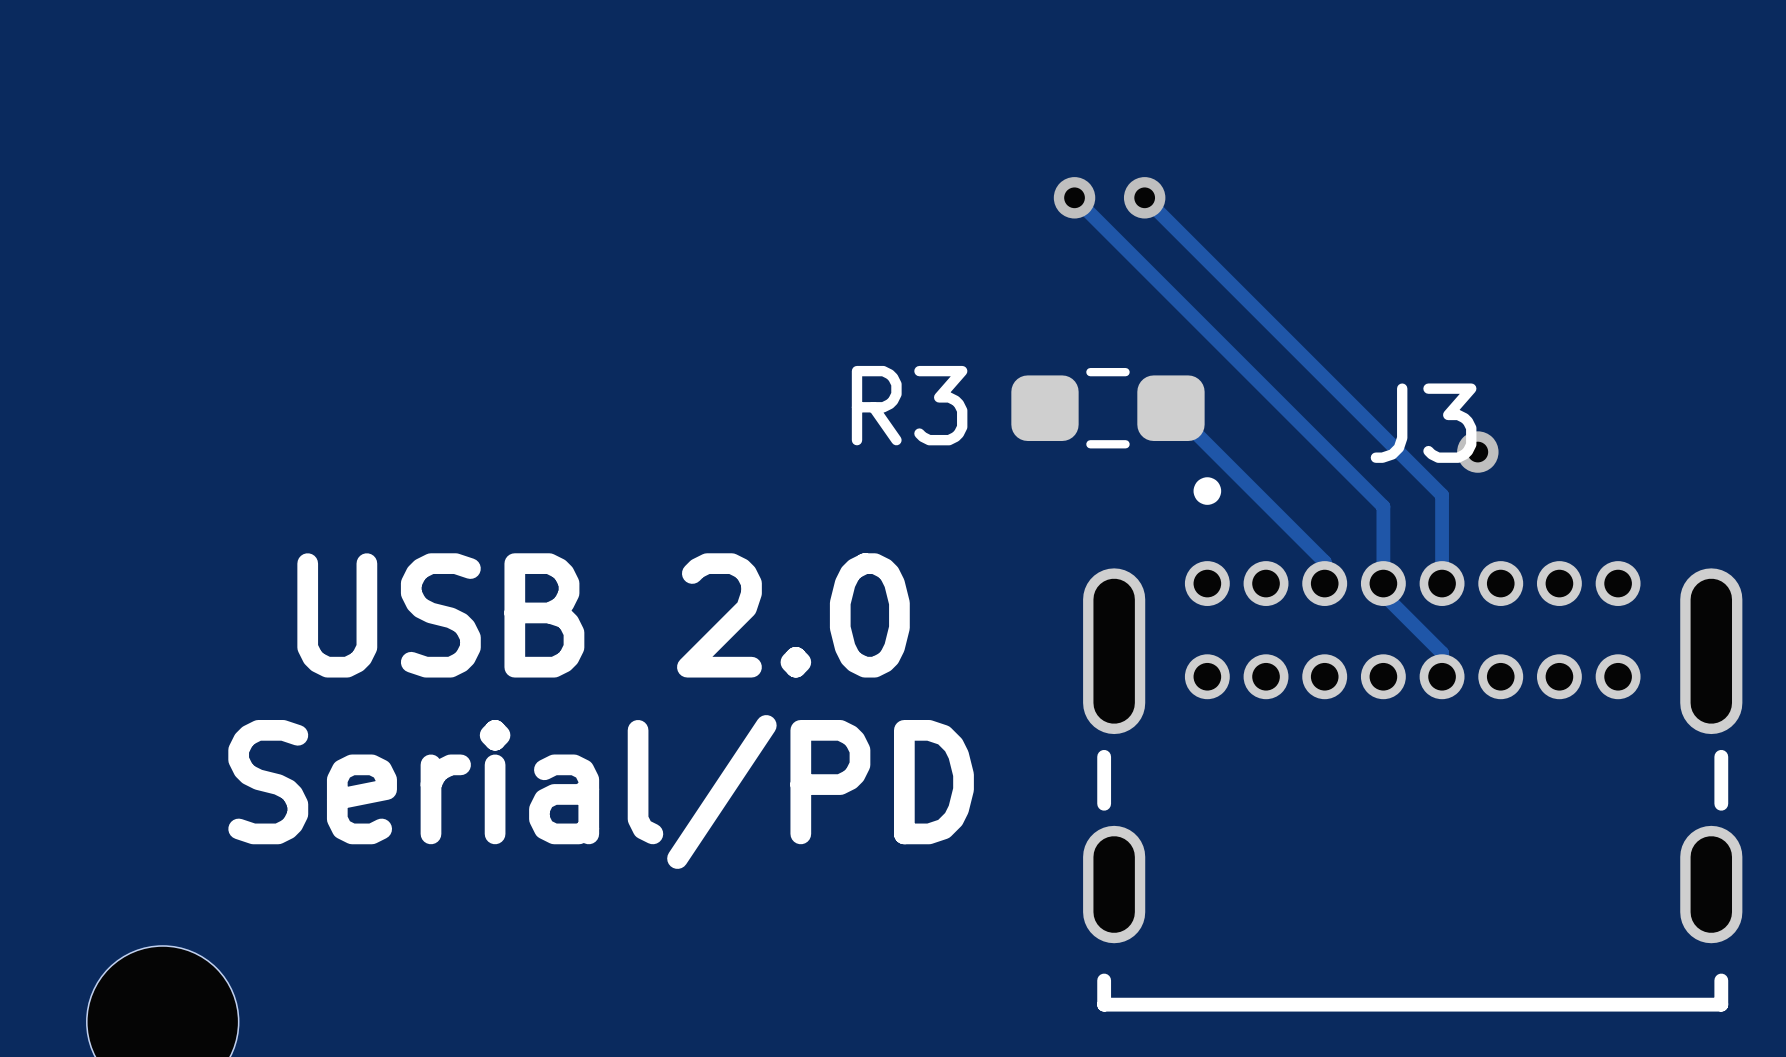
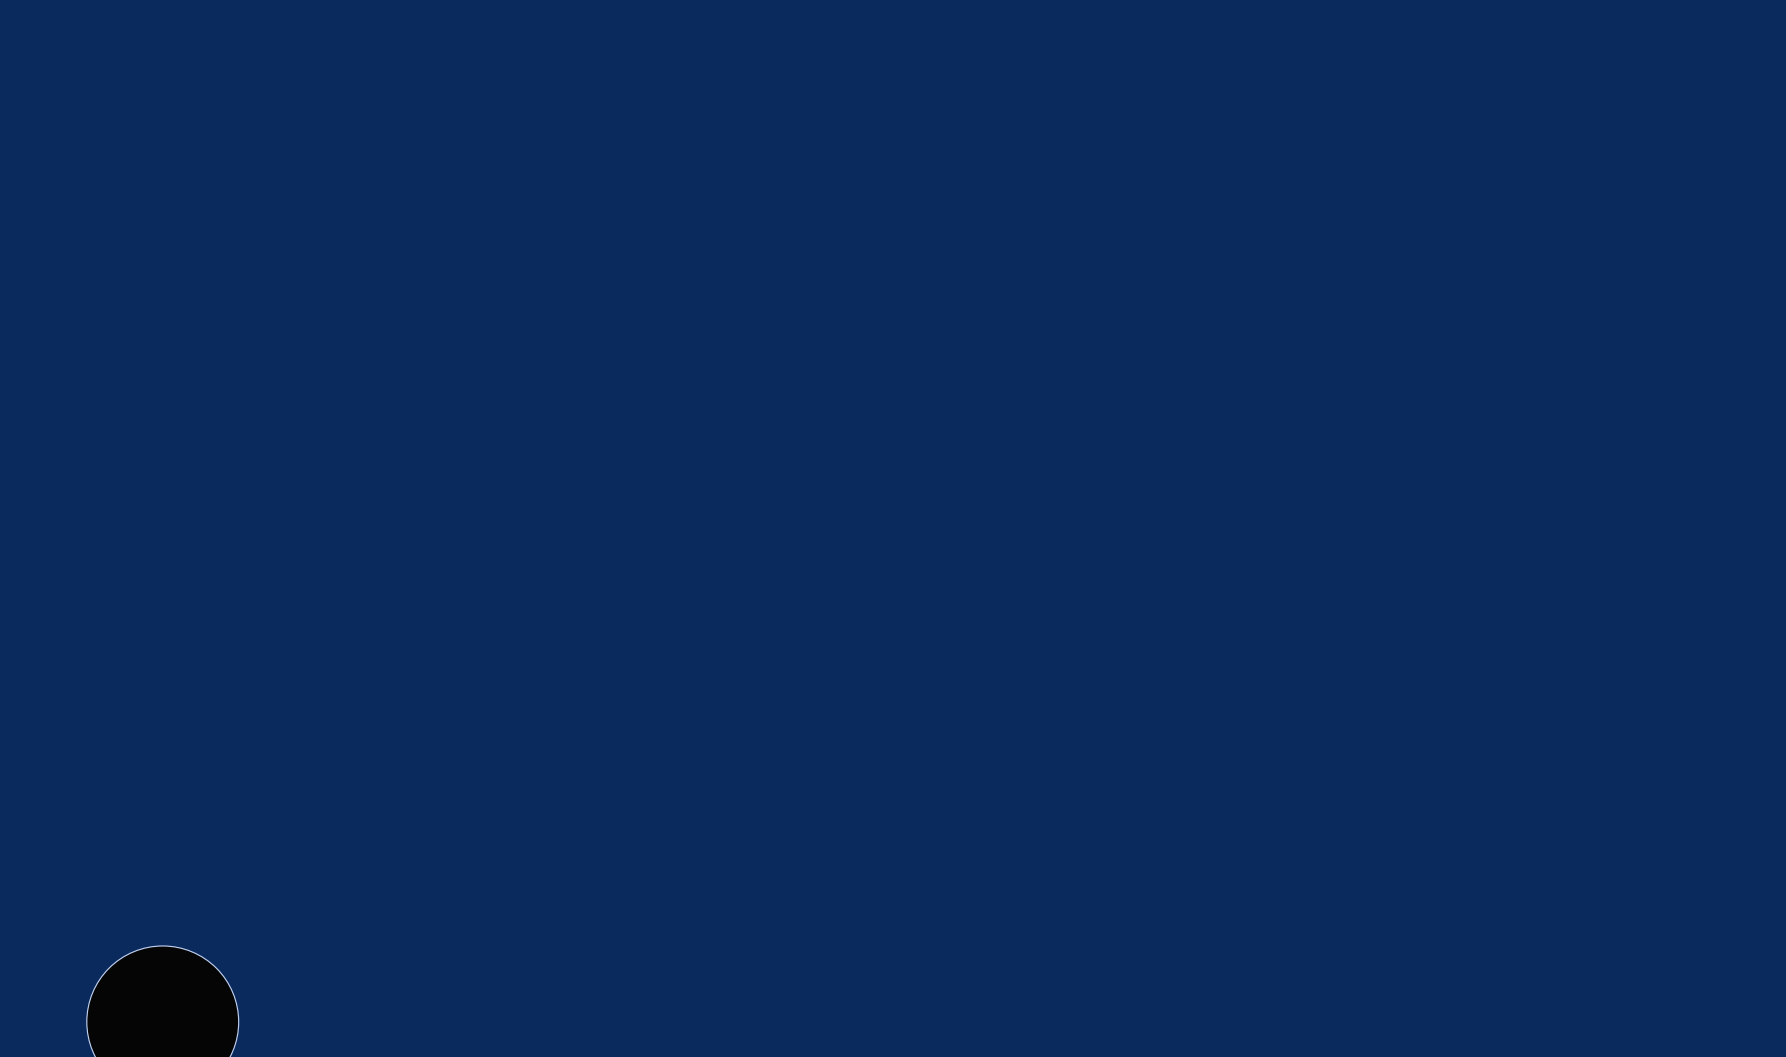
track: (1074, 197) (1383, 506) (1383, 594) (1442, 653) (1442, 676) -> none
via: (1074, 197) -> none
track: (1144, 197) (1442, 495) (1442, 583) -> none
via: (1144, 197) -> none
R3: (1107, 408) -> none
track: (1170, 408) (1324, 561) (1324, 583) -> none
via: (1477, 452) -> none
text: USB 2.0 (603, 615) -> none
J3: (1412, 744) -> none
text: Serial/PD (601, 791) -> none

